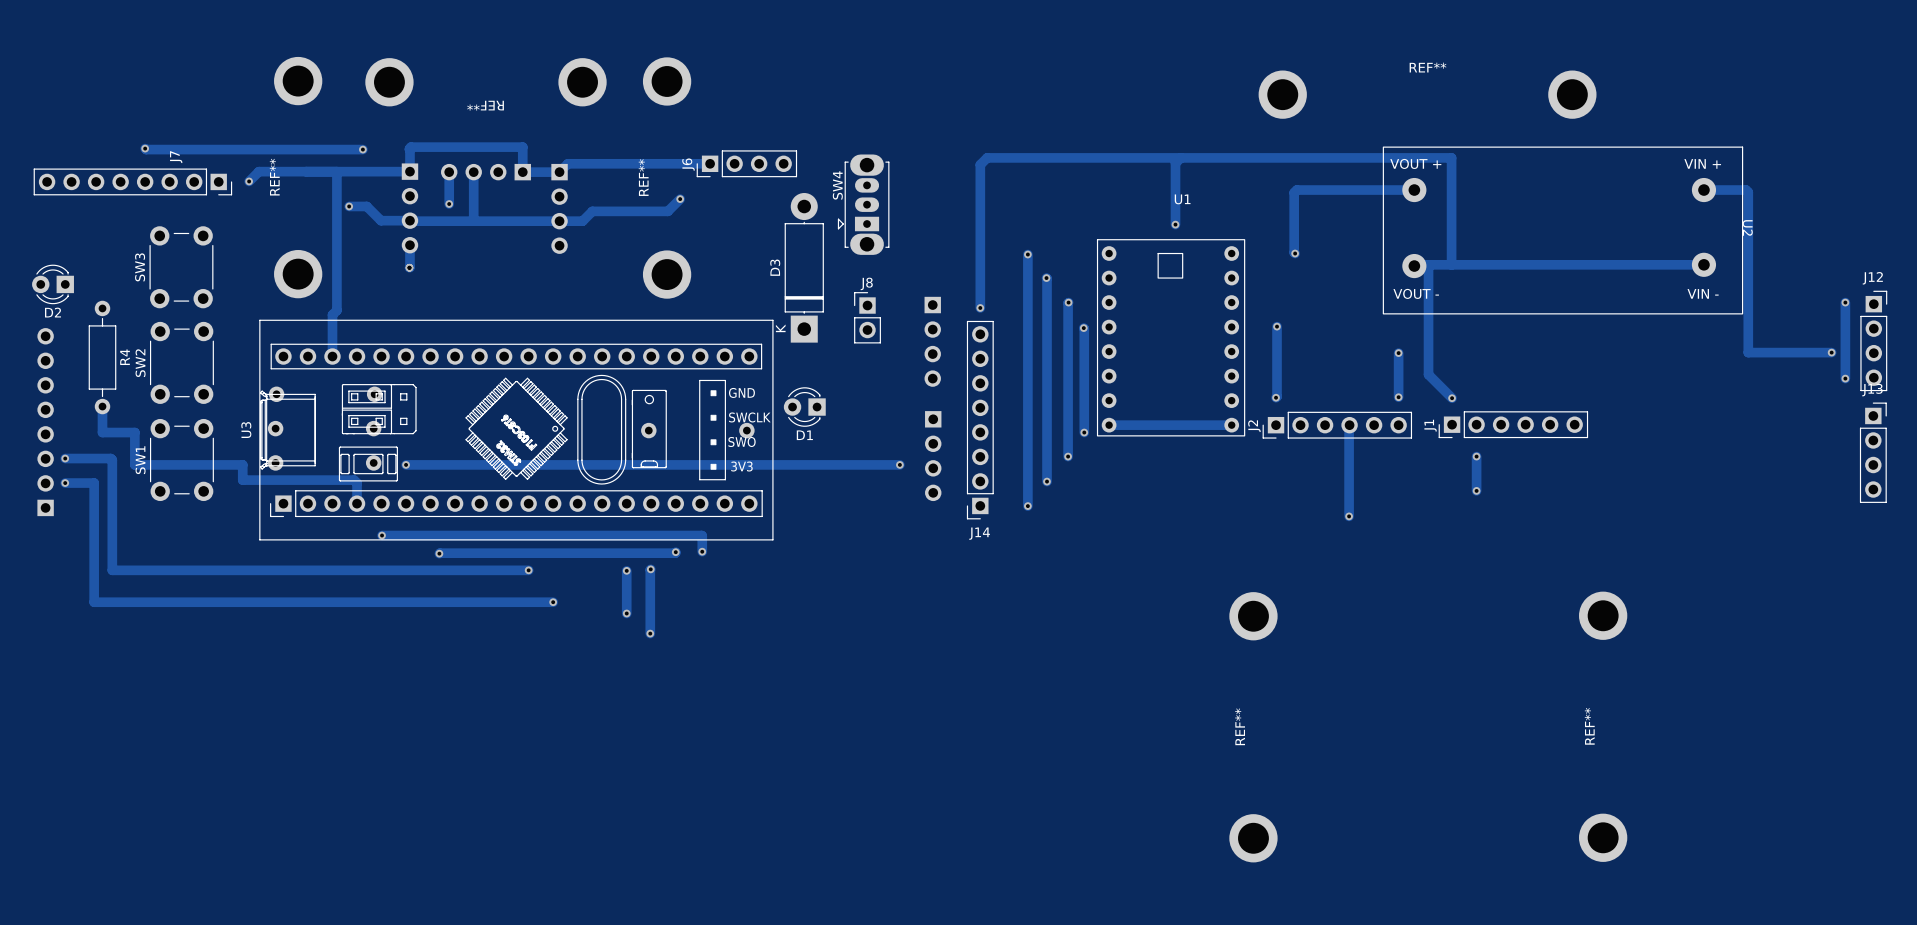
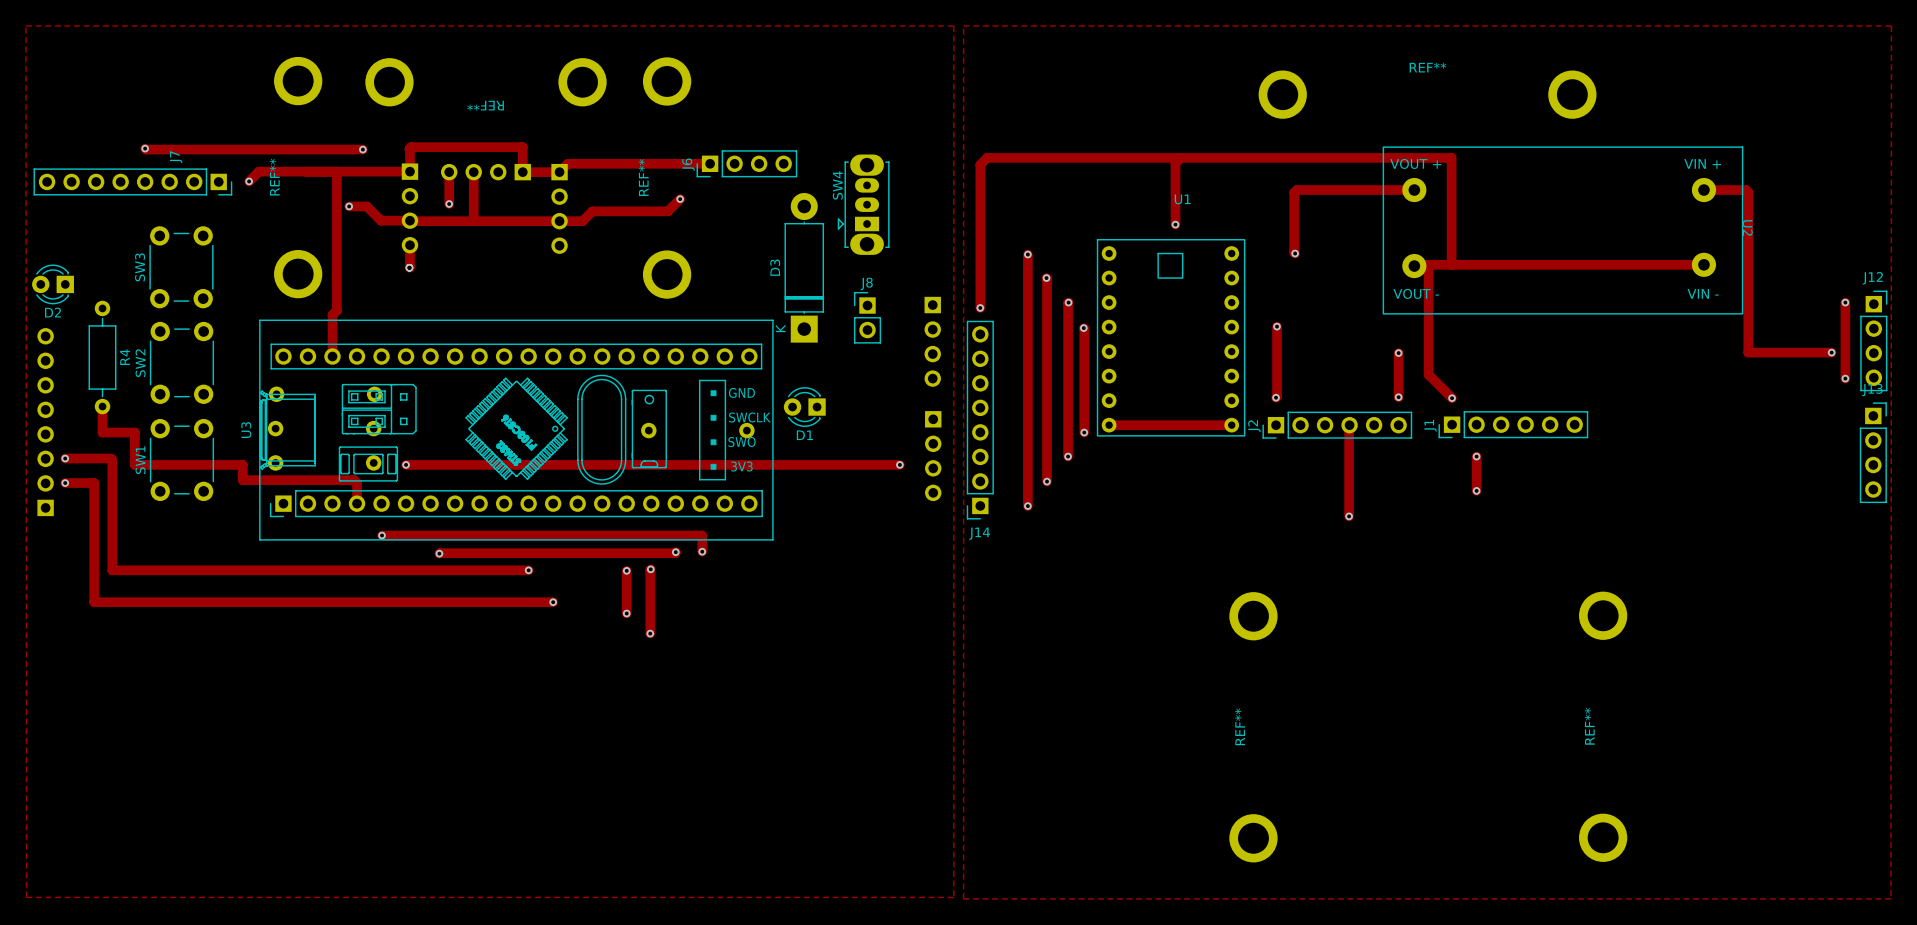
zone outline: none -> (25, 25) (953, 25) (953, 897) (26, 897) (25, 25)
zone outline: none -> (963, 25) (963, 898) (1890, 898) (1891, 25) (963, 25)

